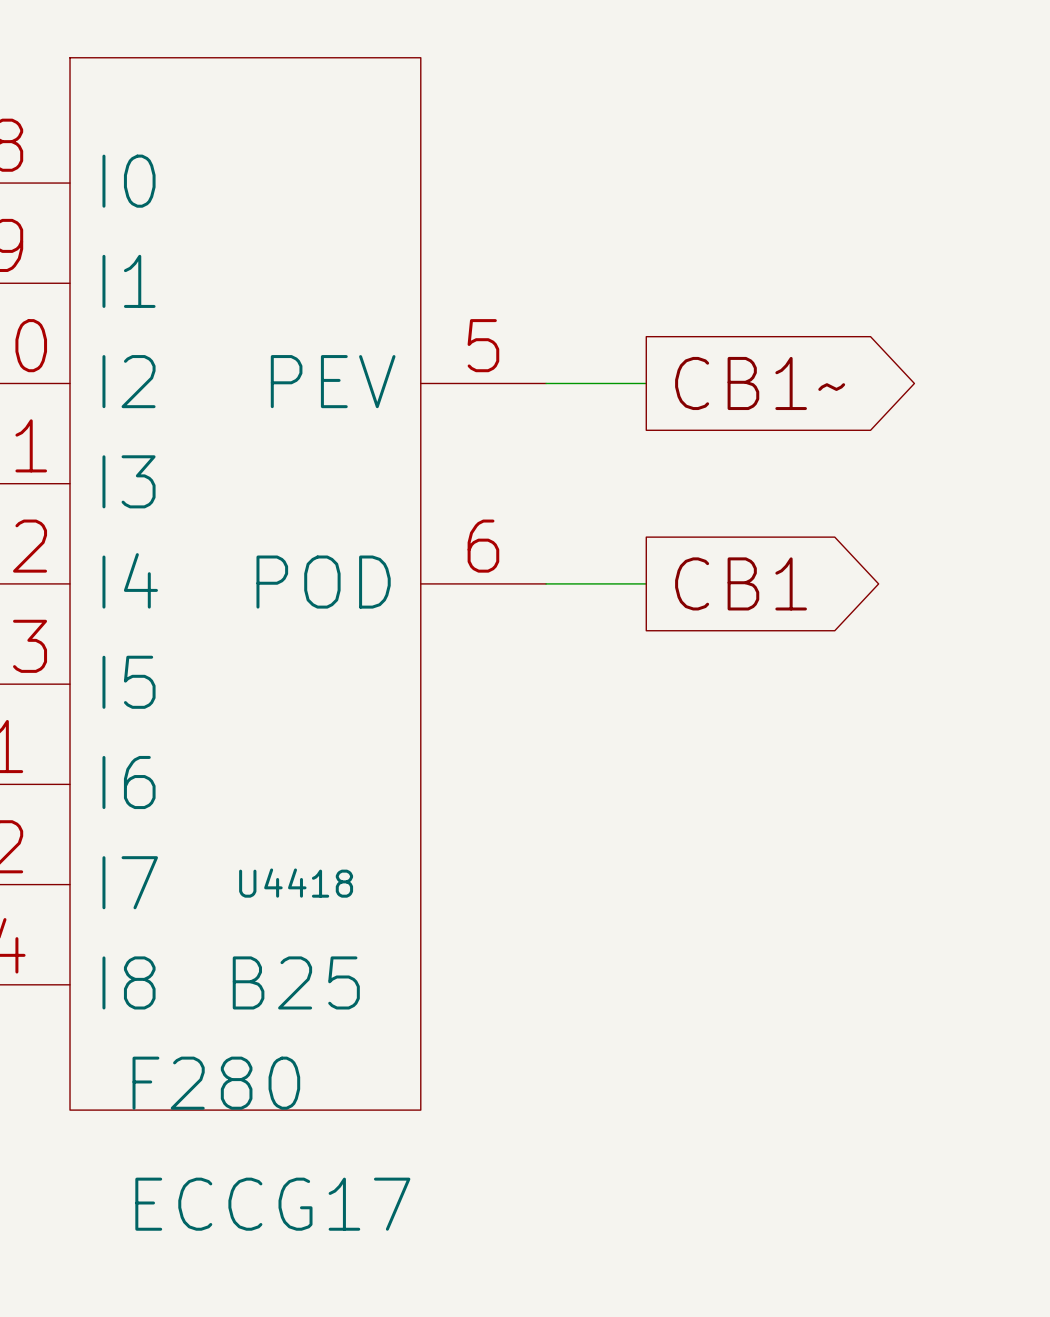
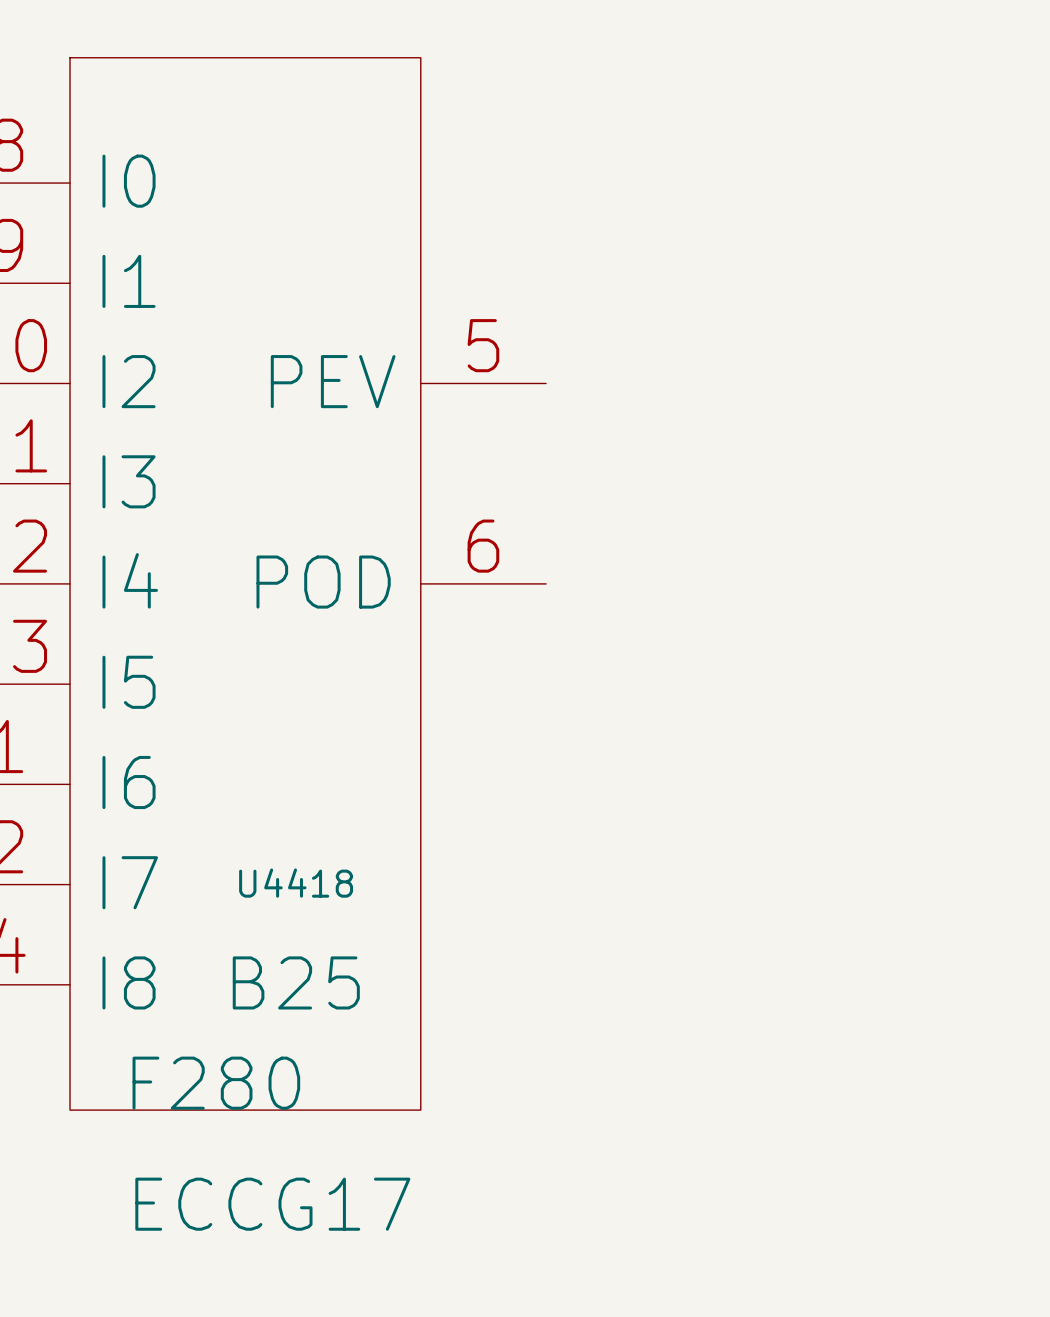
wire: (546, 383) (646, 383) -> none
global label: CB1~ (760, 383) -> none
wire: (546, 583) (646, 583) -> none
global label: CB1 (741, 583) -> none

